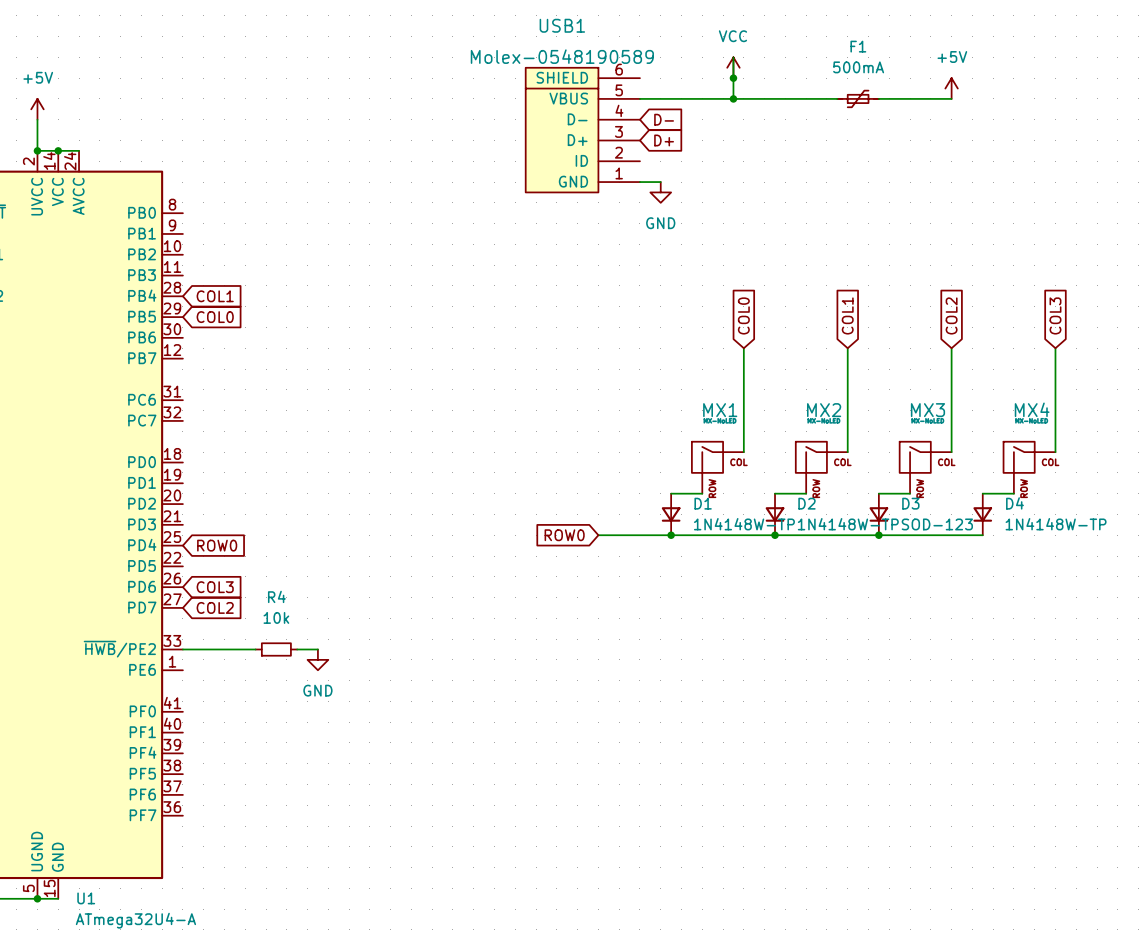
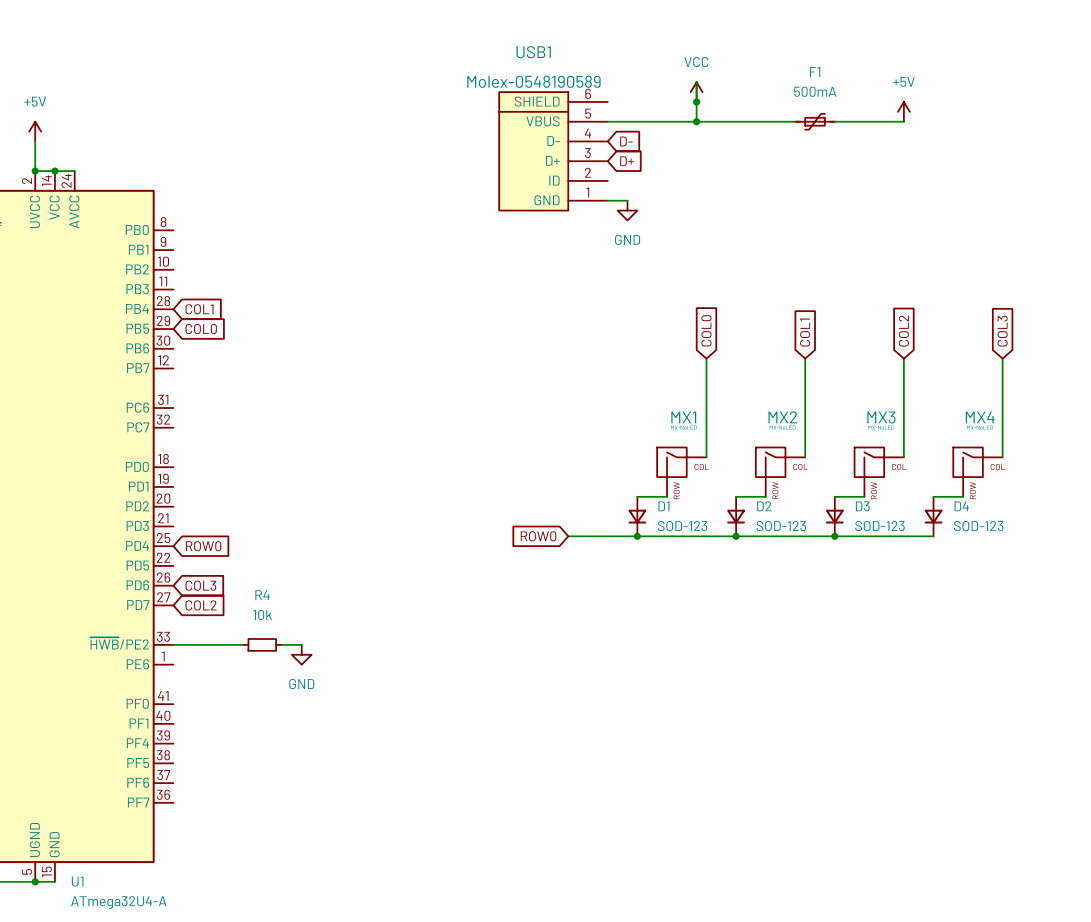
D1 value: 1N4148W-TP (744, 524) -> SOD-123 (682, 526)
D2 value: 1N4148W-TP (848, 524) -> SOD-123 (781, 526)
D4 value: 1N4148W-TP (1056, 524) -> SOD-123 (978, 526)

